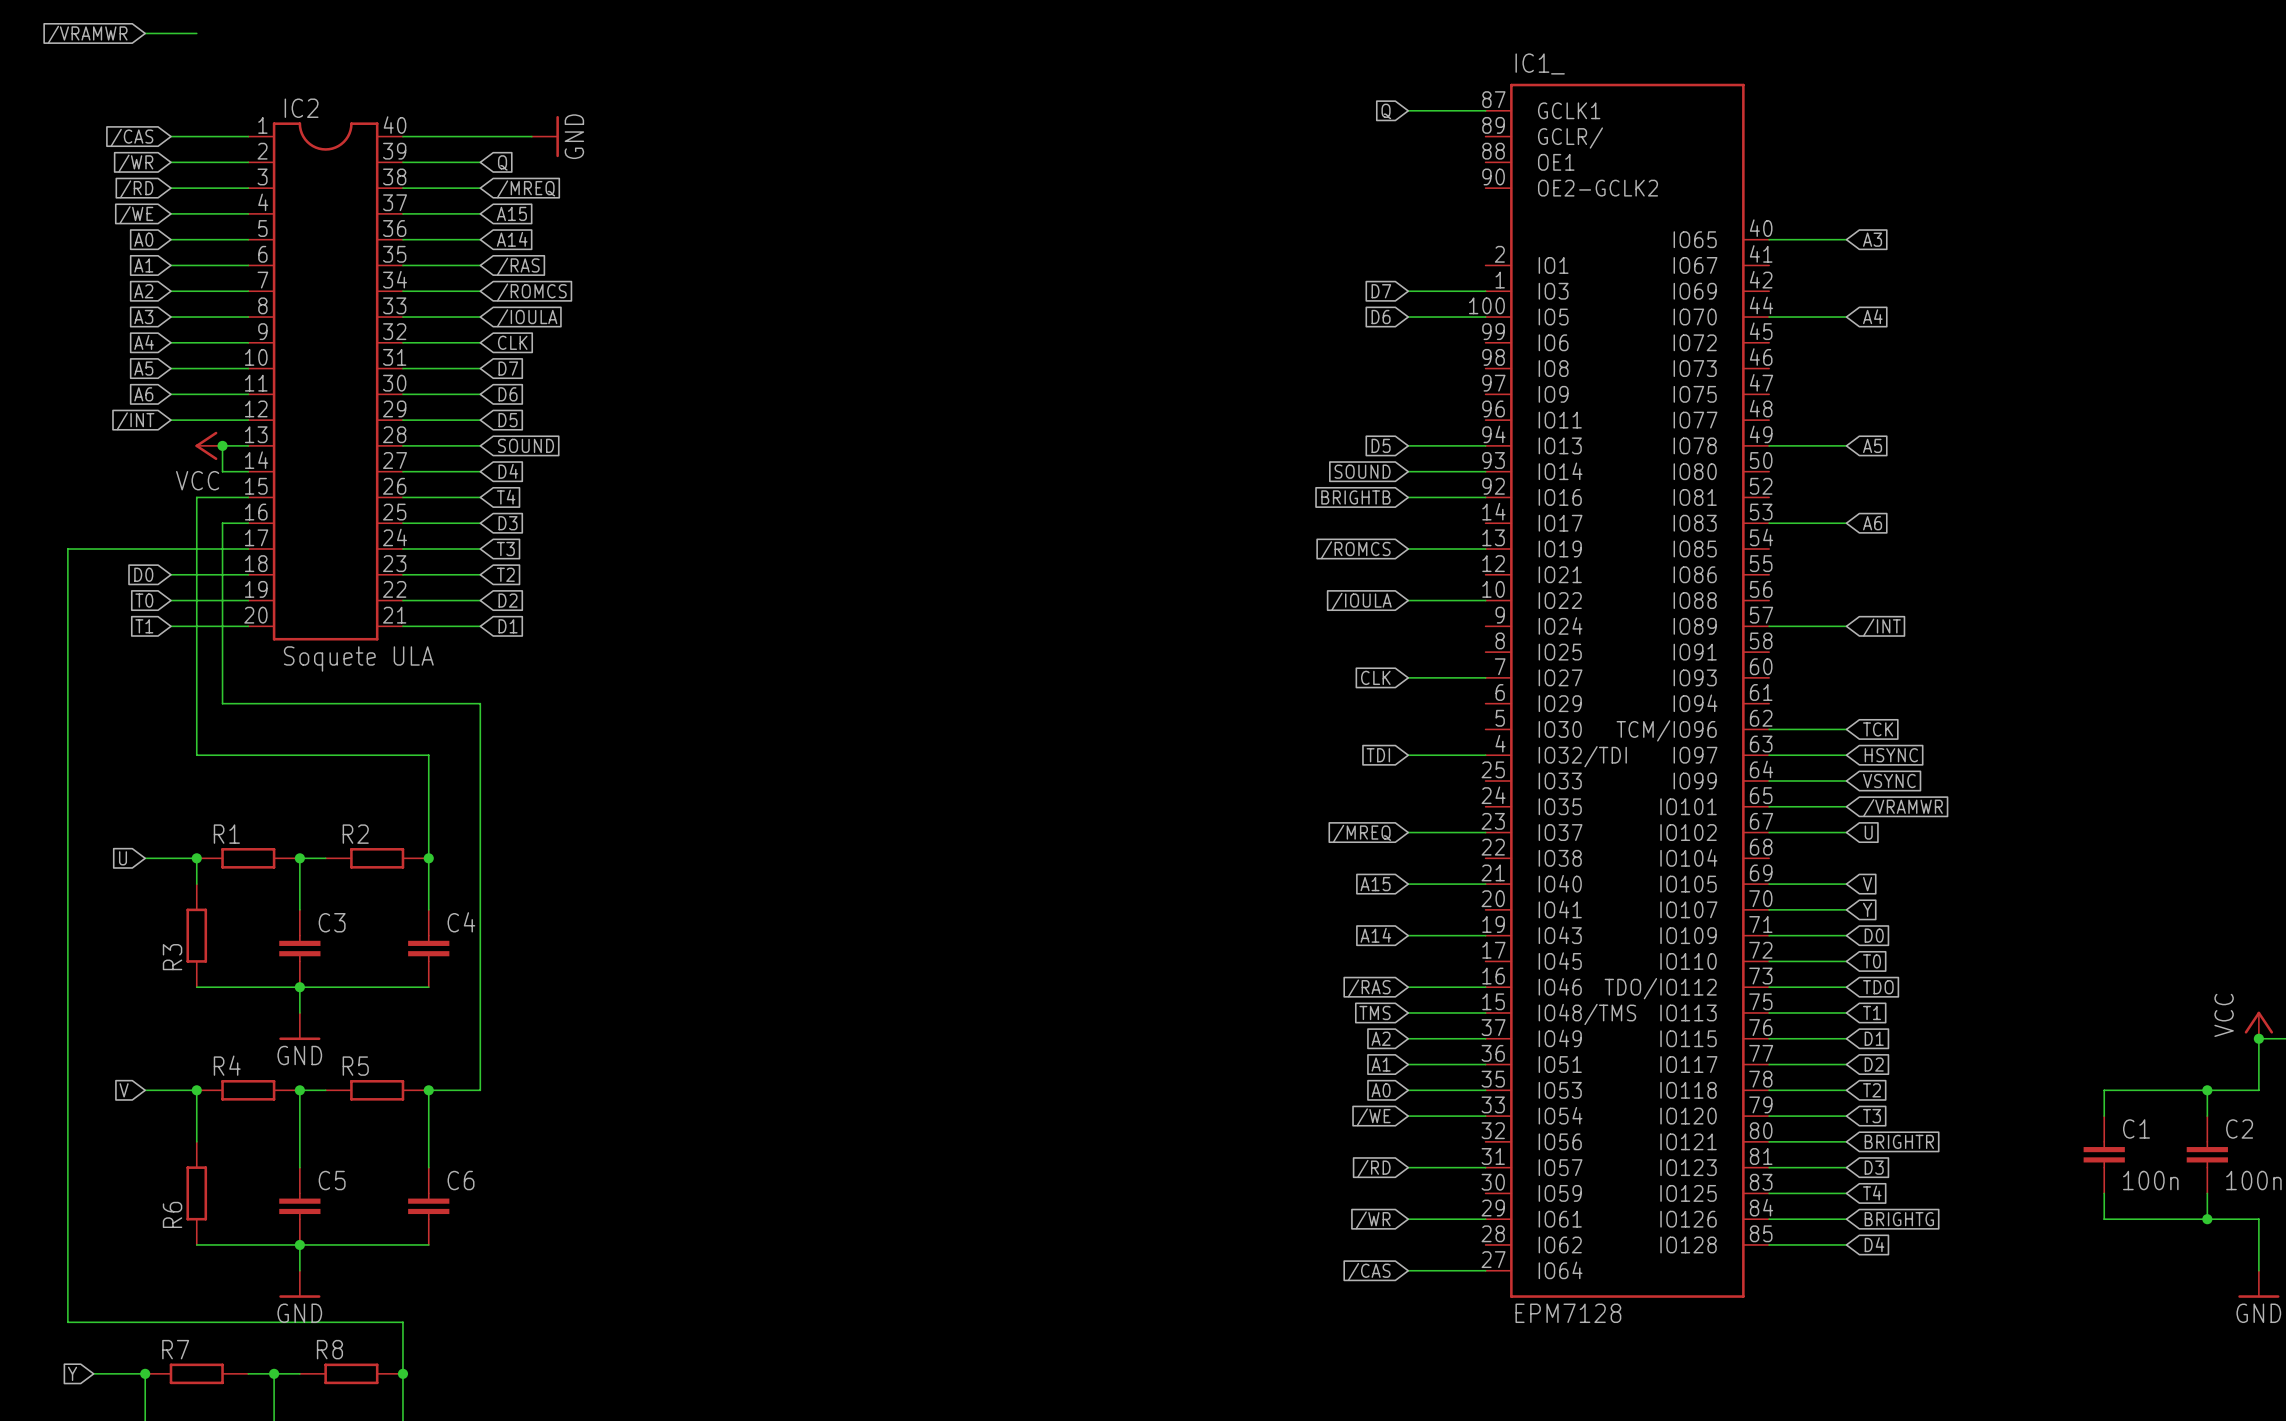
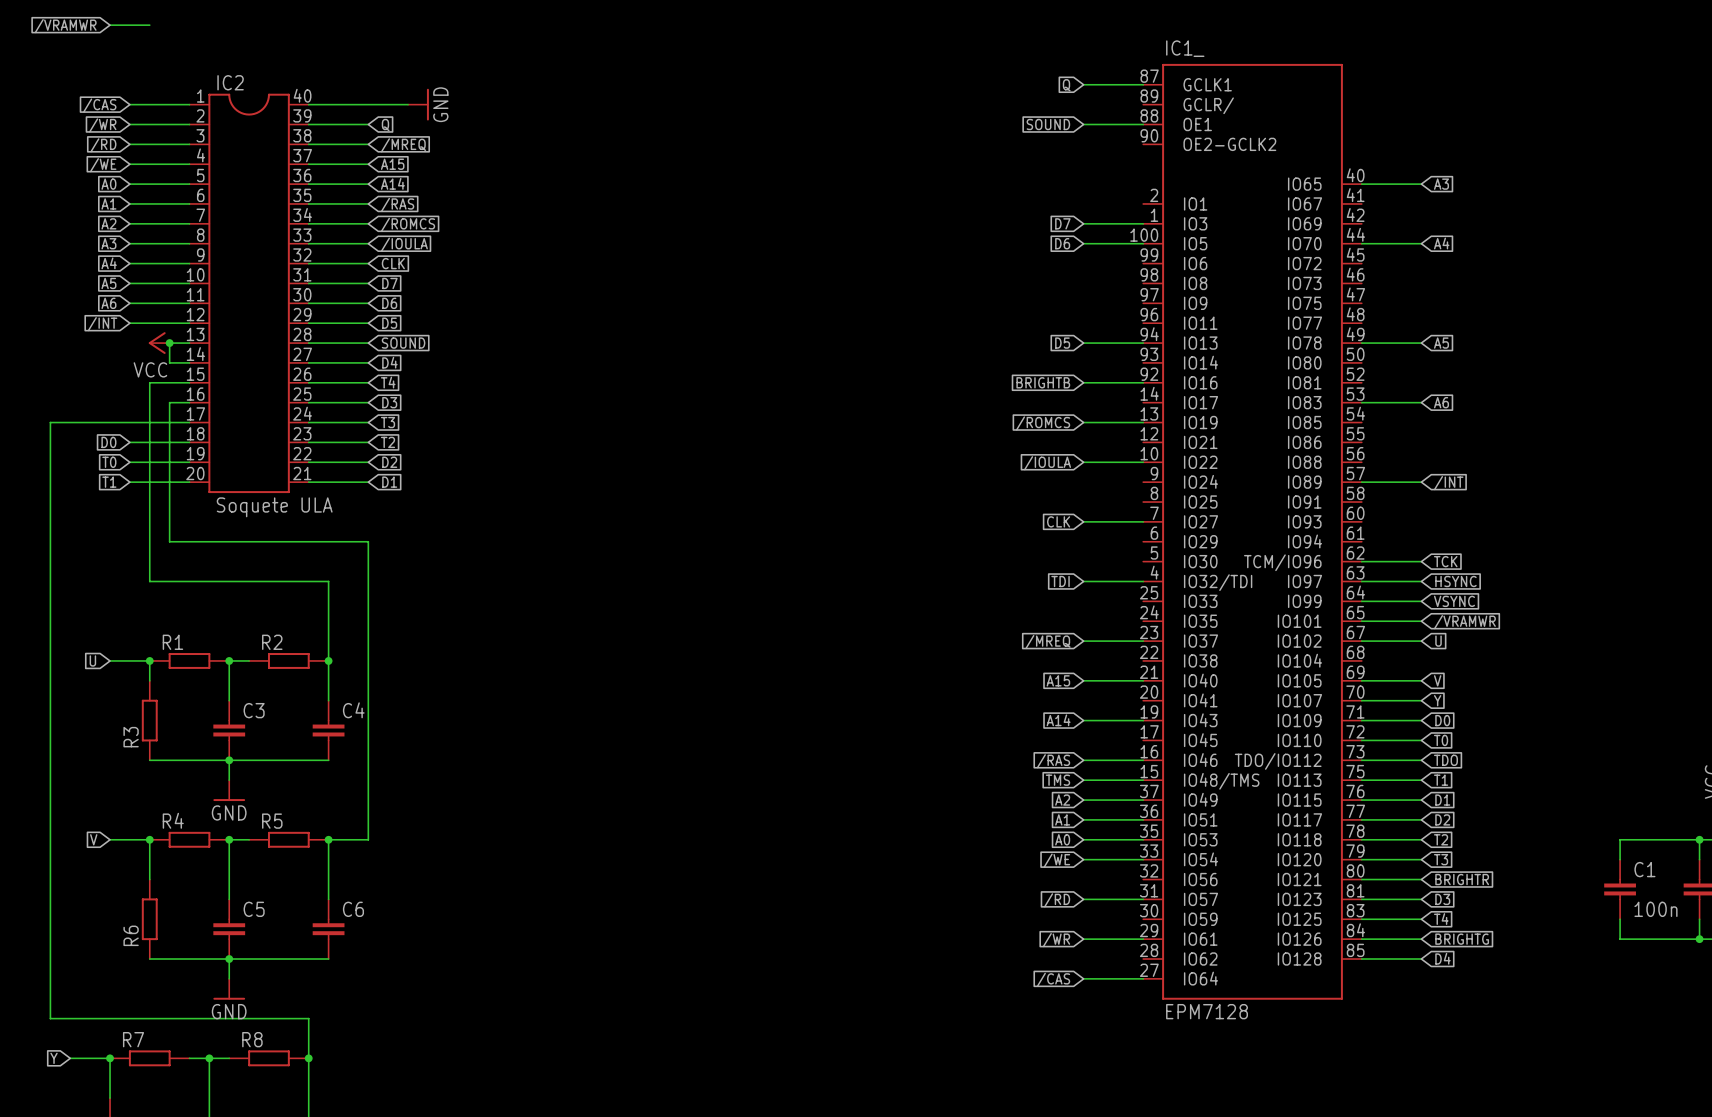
global label: none -> SOUND (1048, 124)
wire: none -> (1083, 124) (1143, 124)
global label: SOUND (1362, 471) -> none
wire: (1408, 471) (1485, 471) -> none

